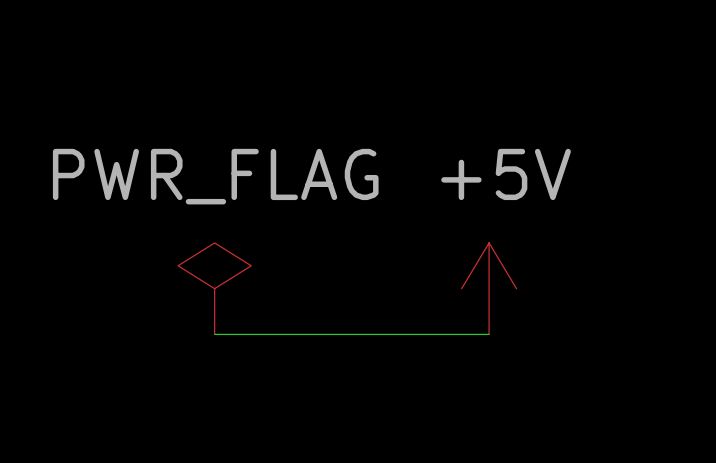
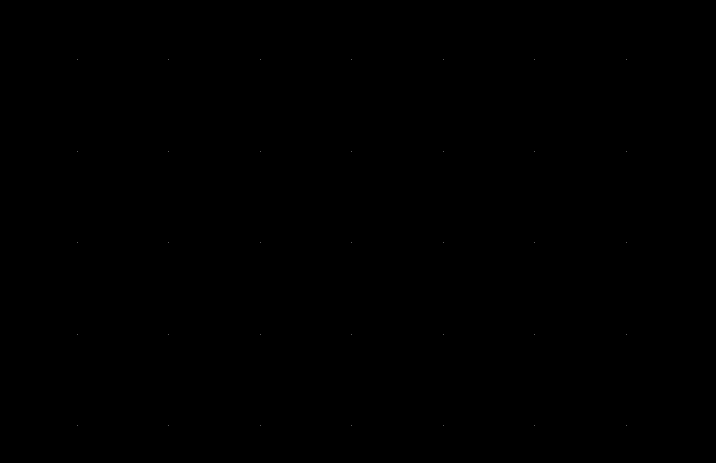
power symbol: PWR_FLAG (214, 288) -> none
power symbol: +5V (489, 288) -> none
wire: (214, 334) (489, 334) -> none

